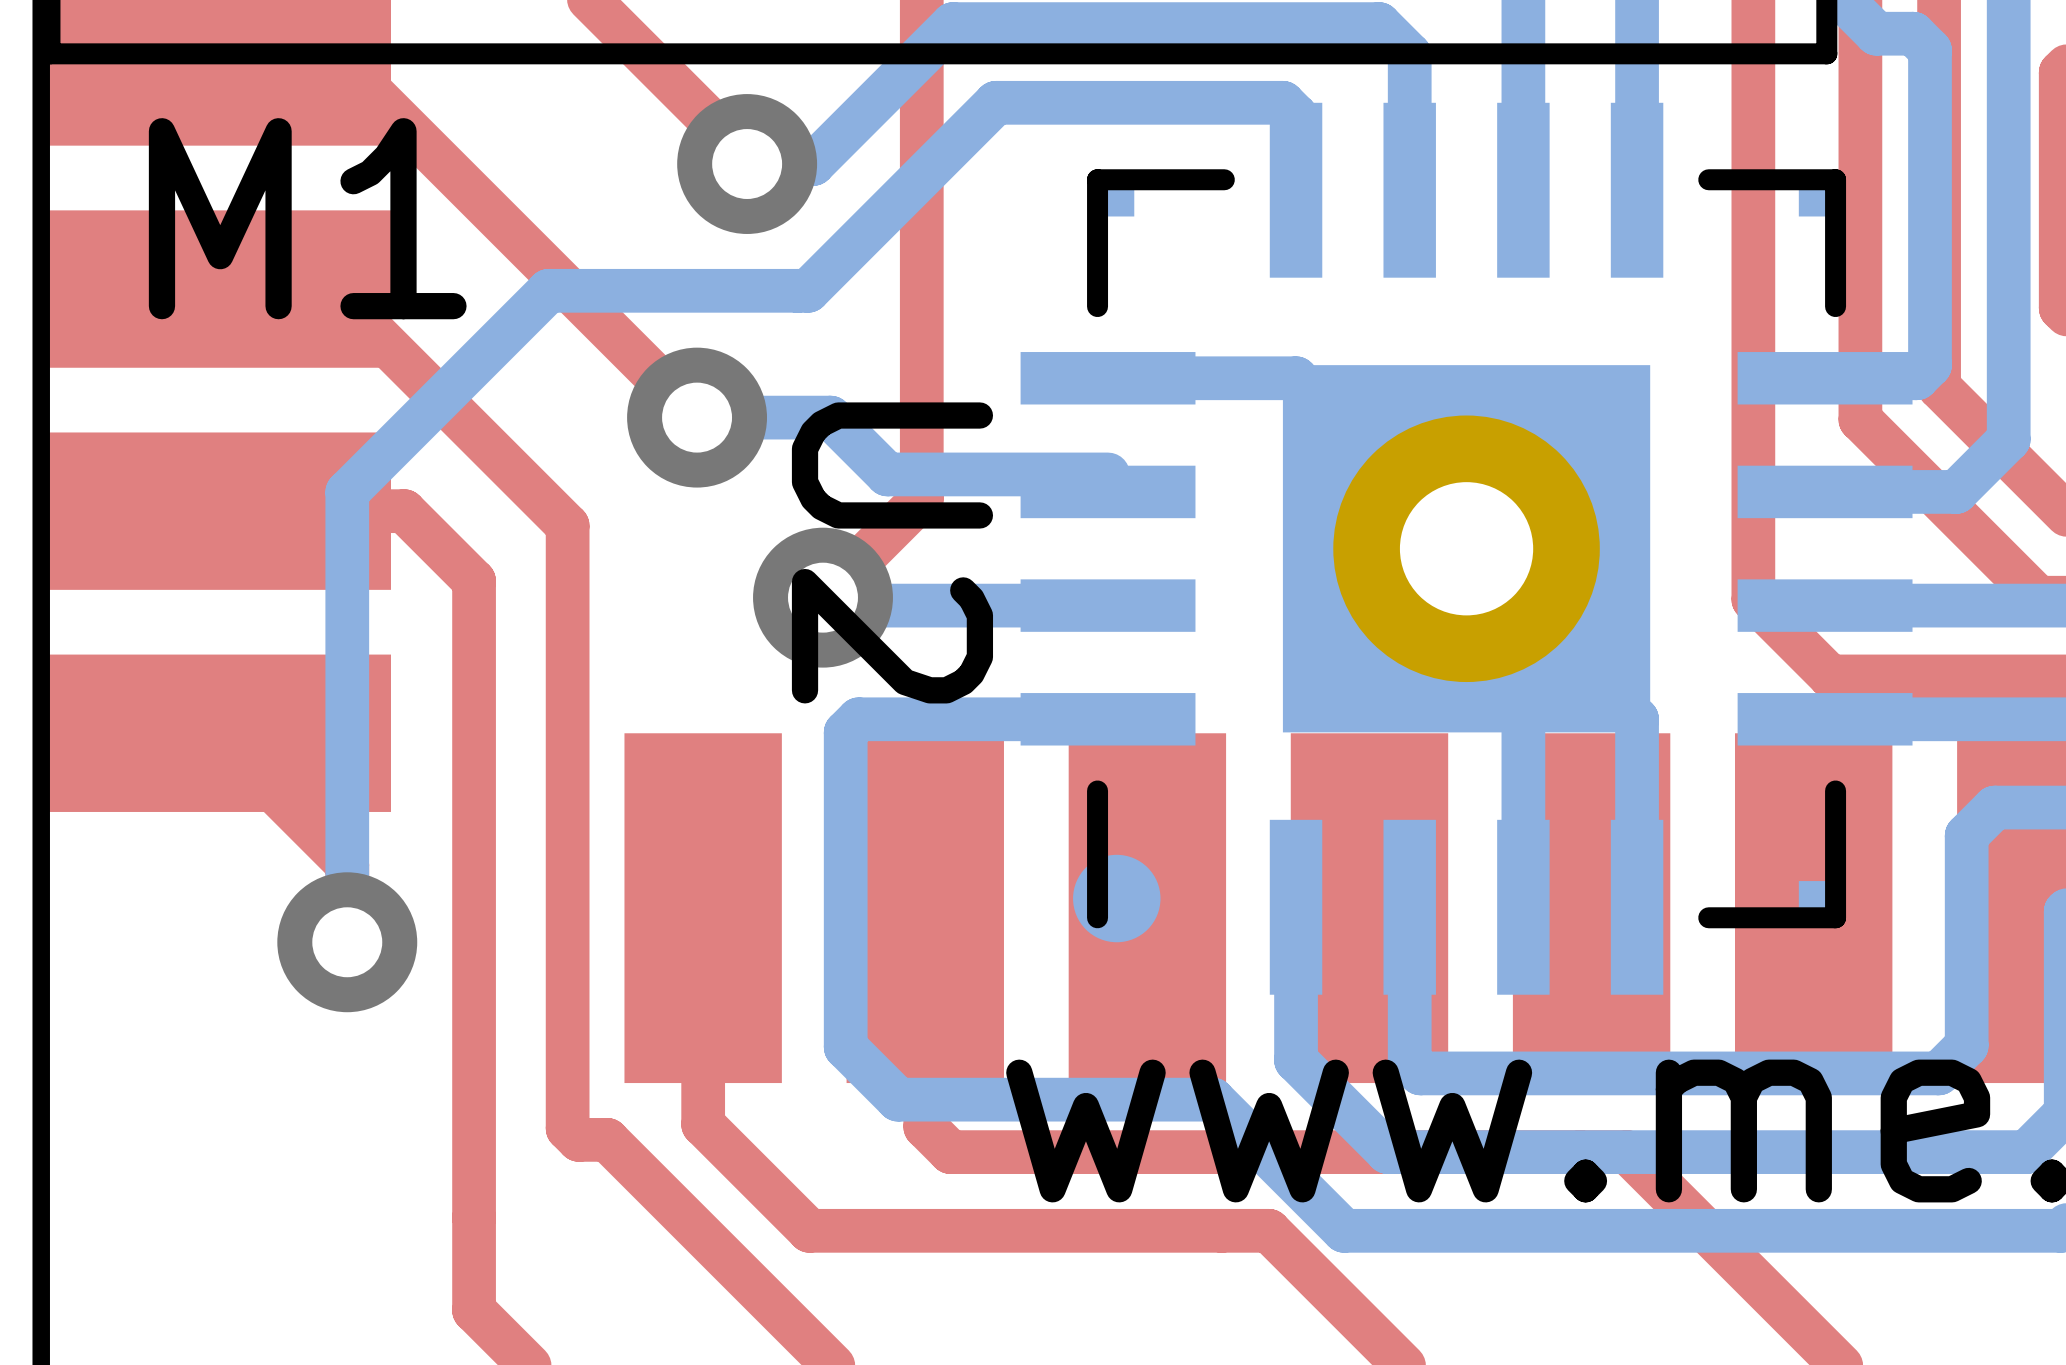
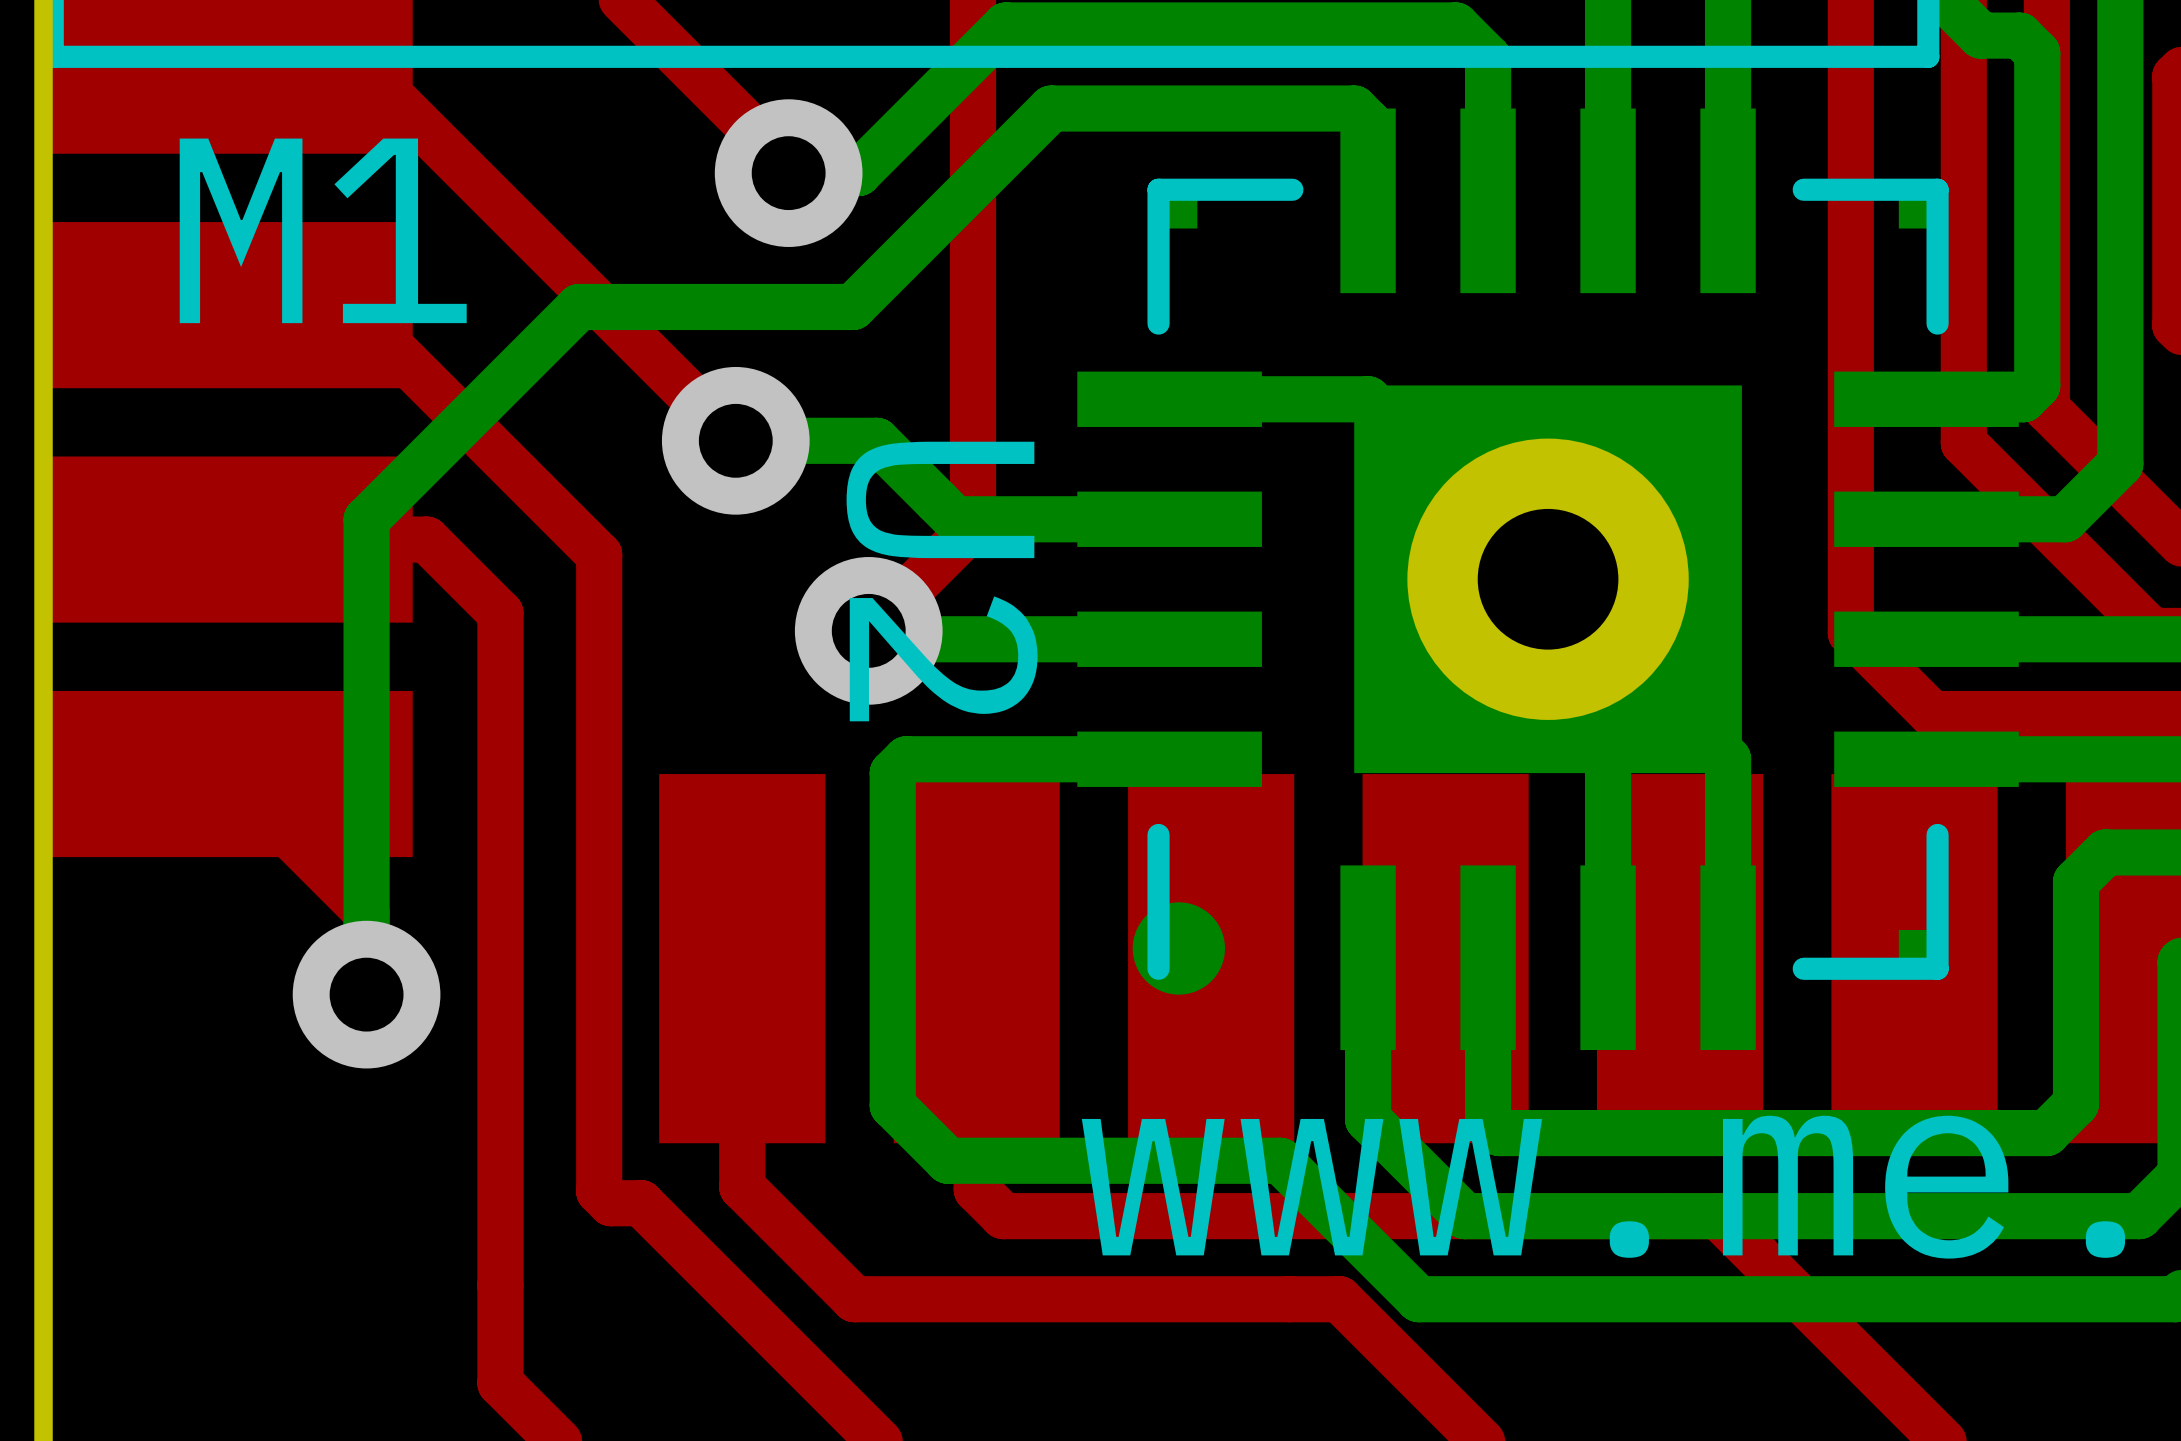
bottom track: (1108, 474) (887, 474) -> (1169, 519) (955, 519) (936, 500)

